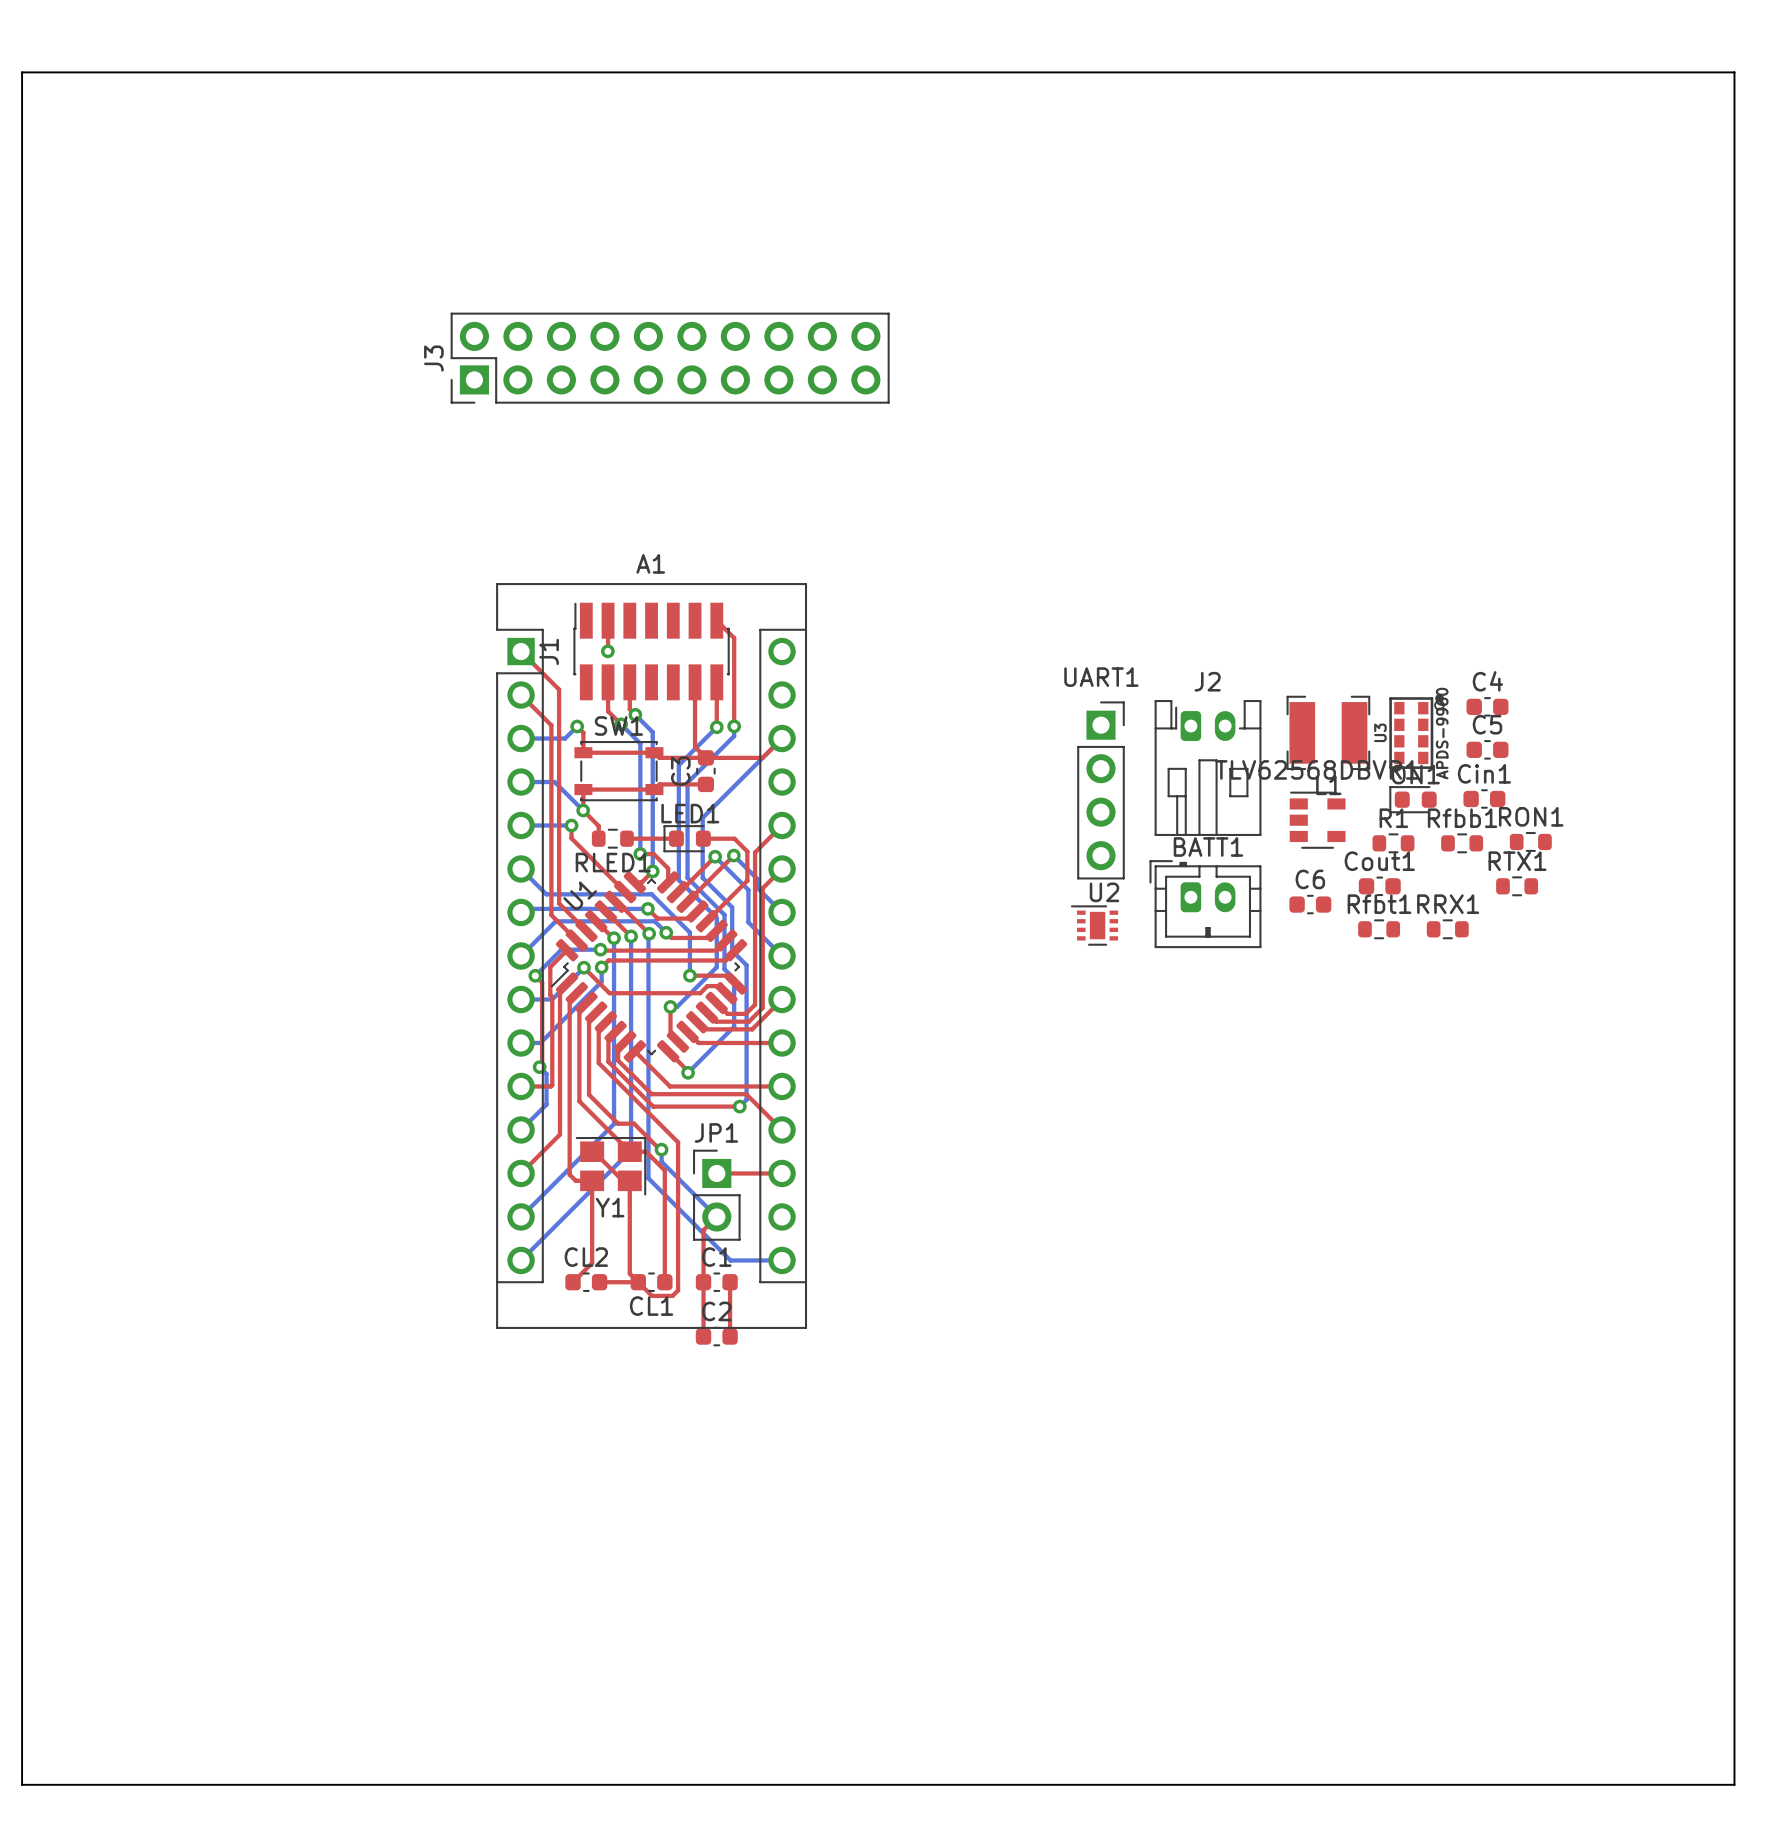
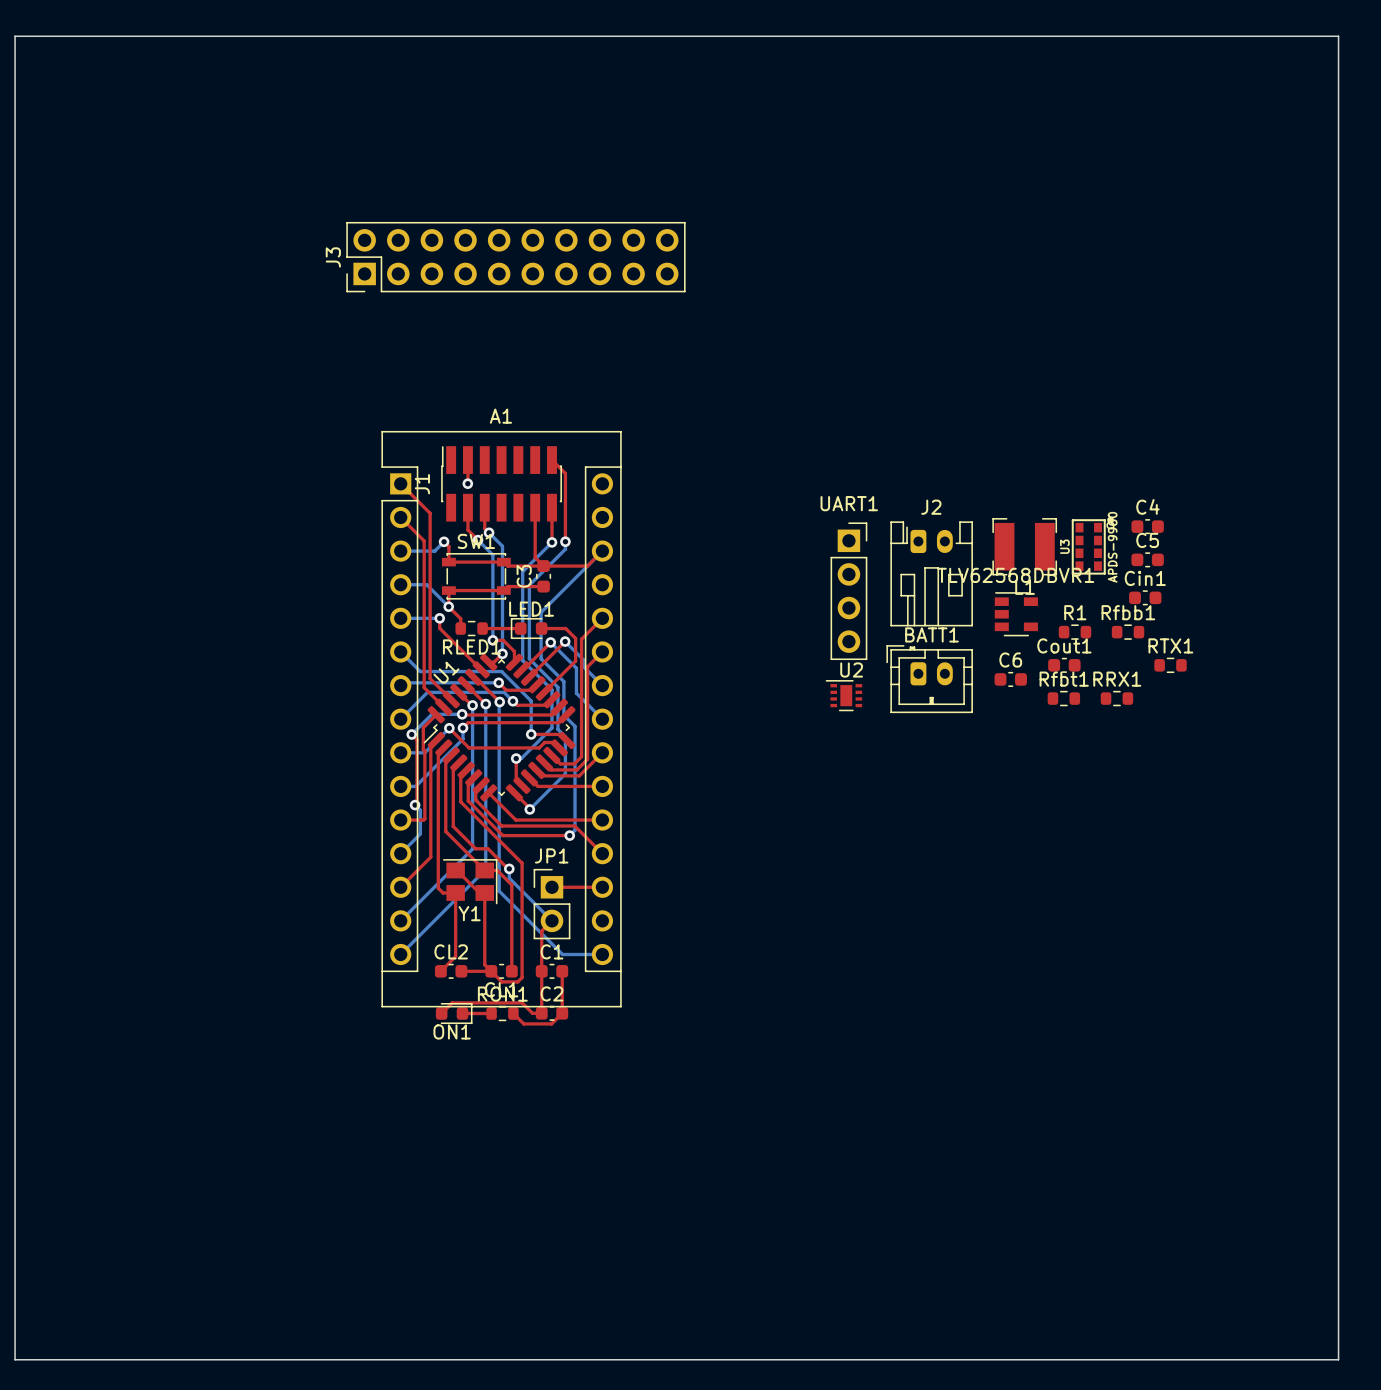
ON1 rotation: 0° (1413, 799) -> 180° (454, 1013)
ON1 position: (1413, 799) -> (454, 1013)
RON1 position: (1530, 841) -> (502, 1013)
top track: none -> (462, 1013) (491, 1013)
top track: none -> (541, 1013) (532, 1013) (522, 1002) (452, 1002) (441, 1013)
top track: none -> (562, 1013) (551, 1023) (523, 1023) (513, 1013)

